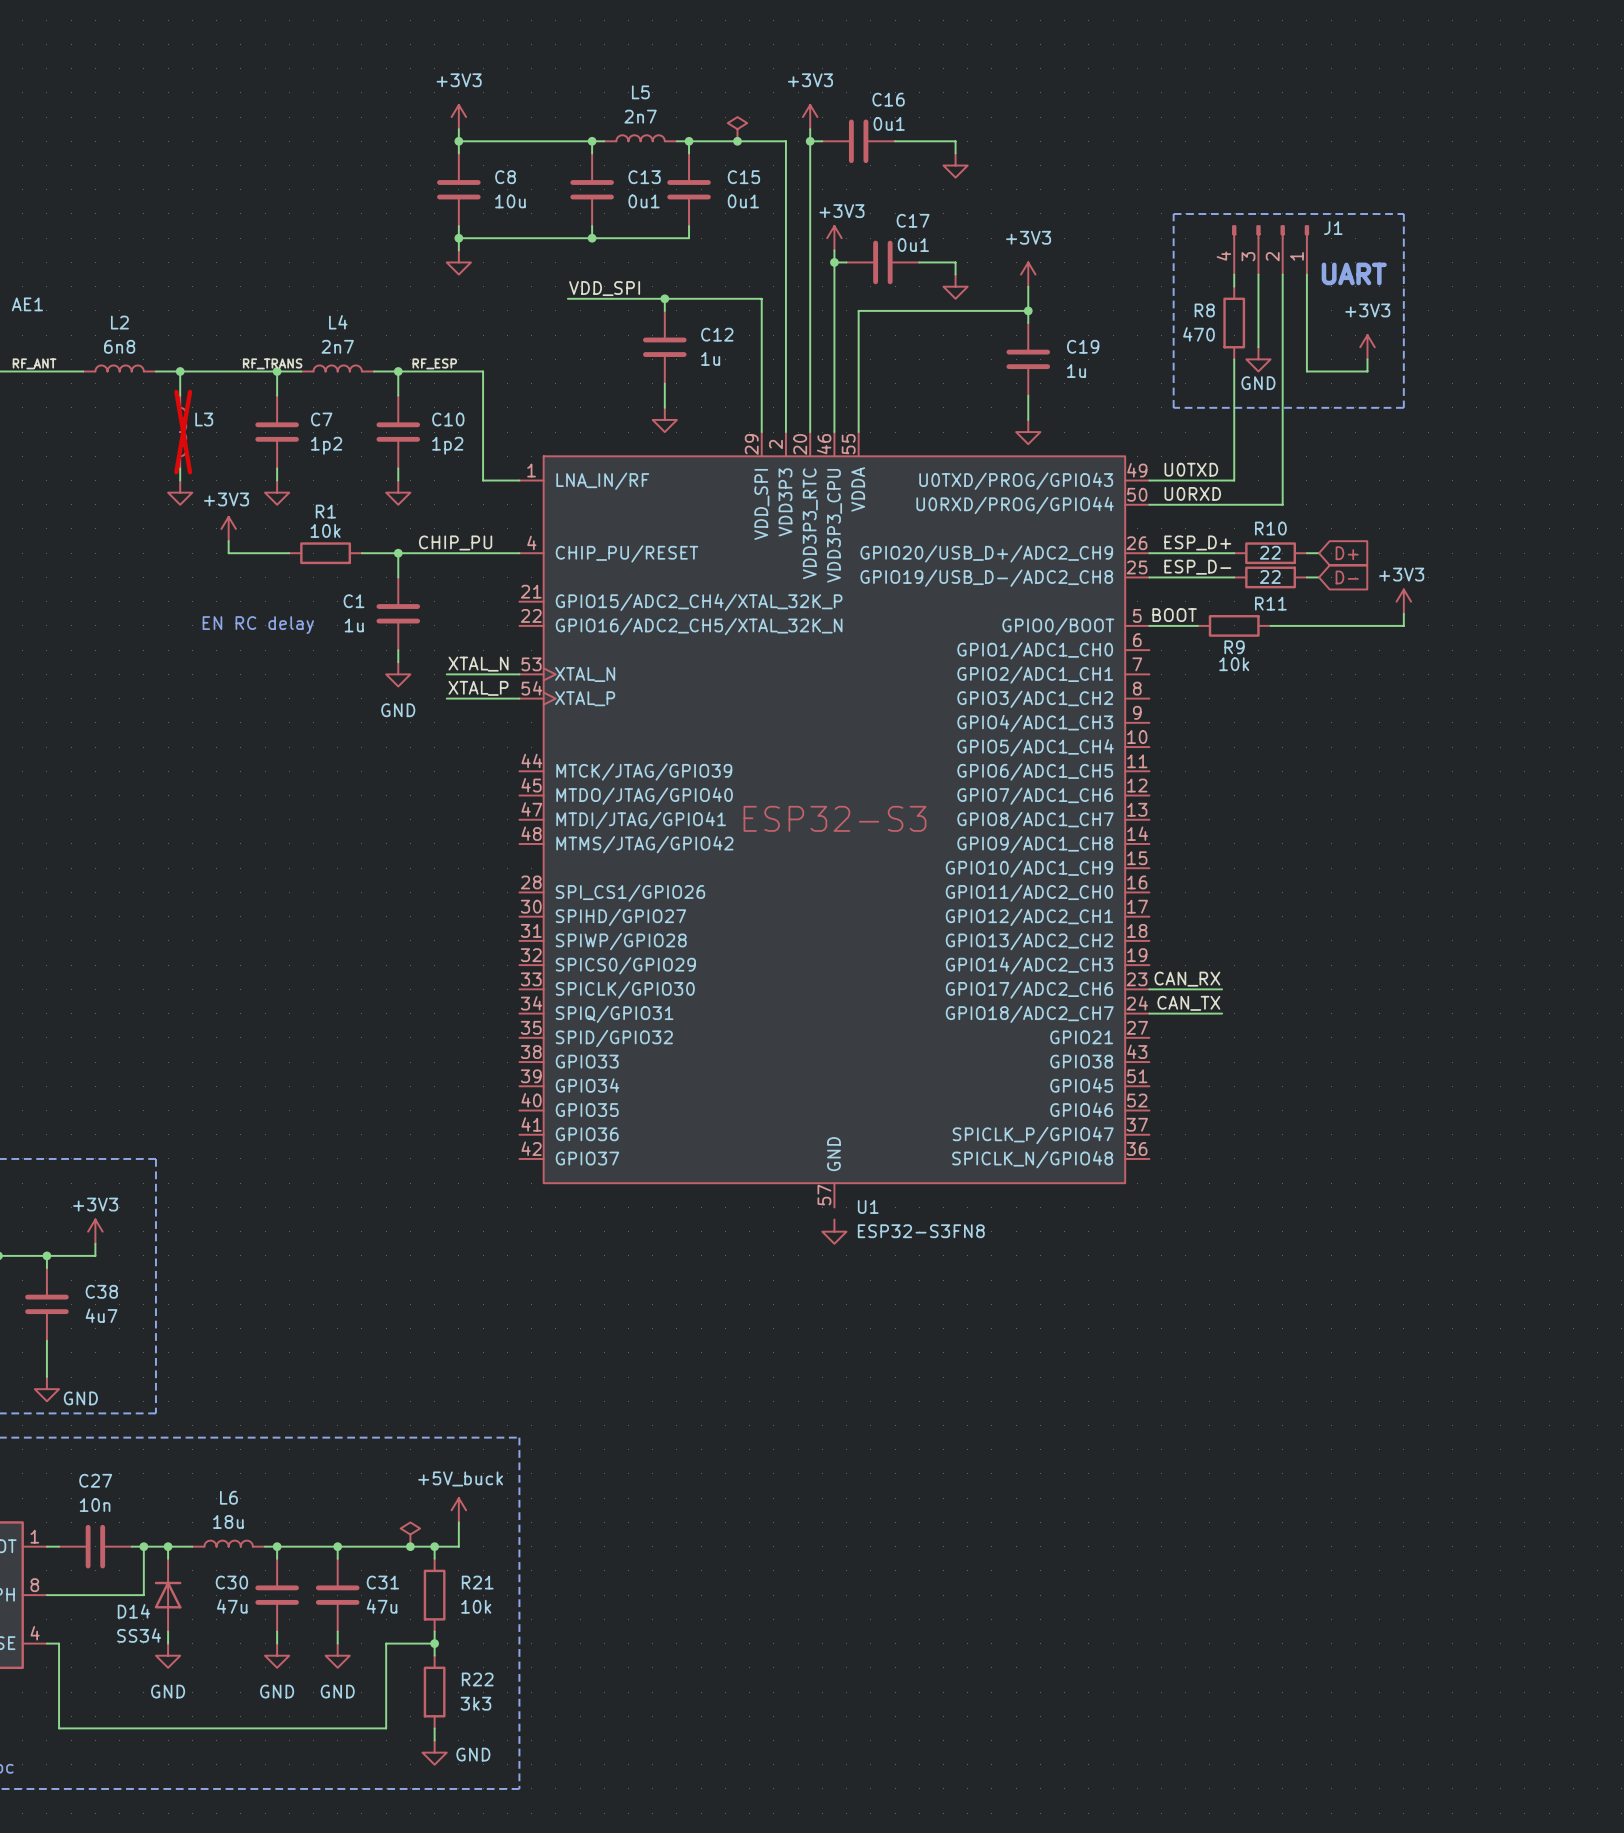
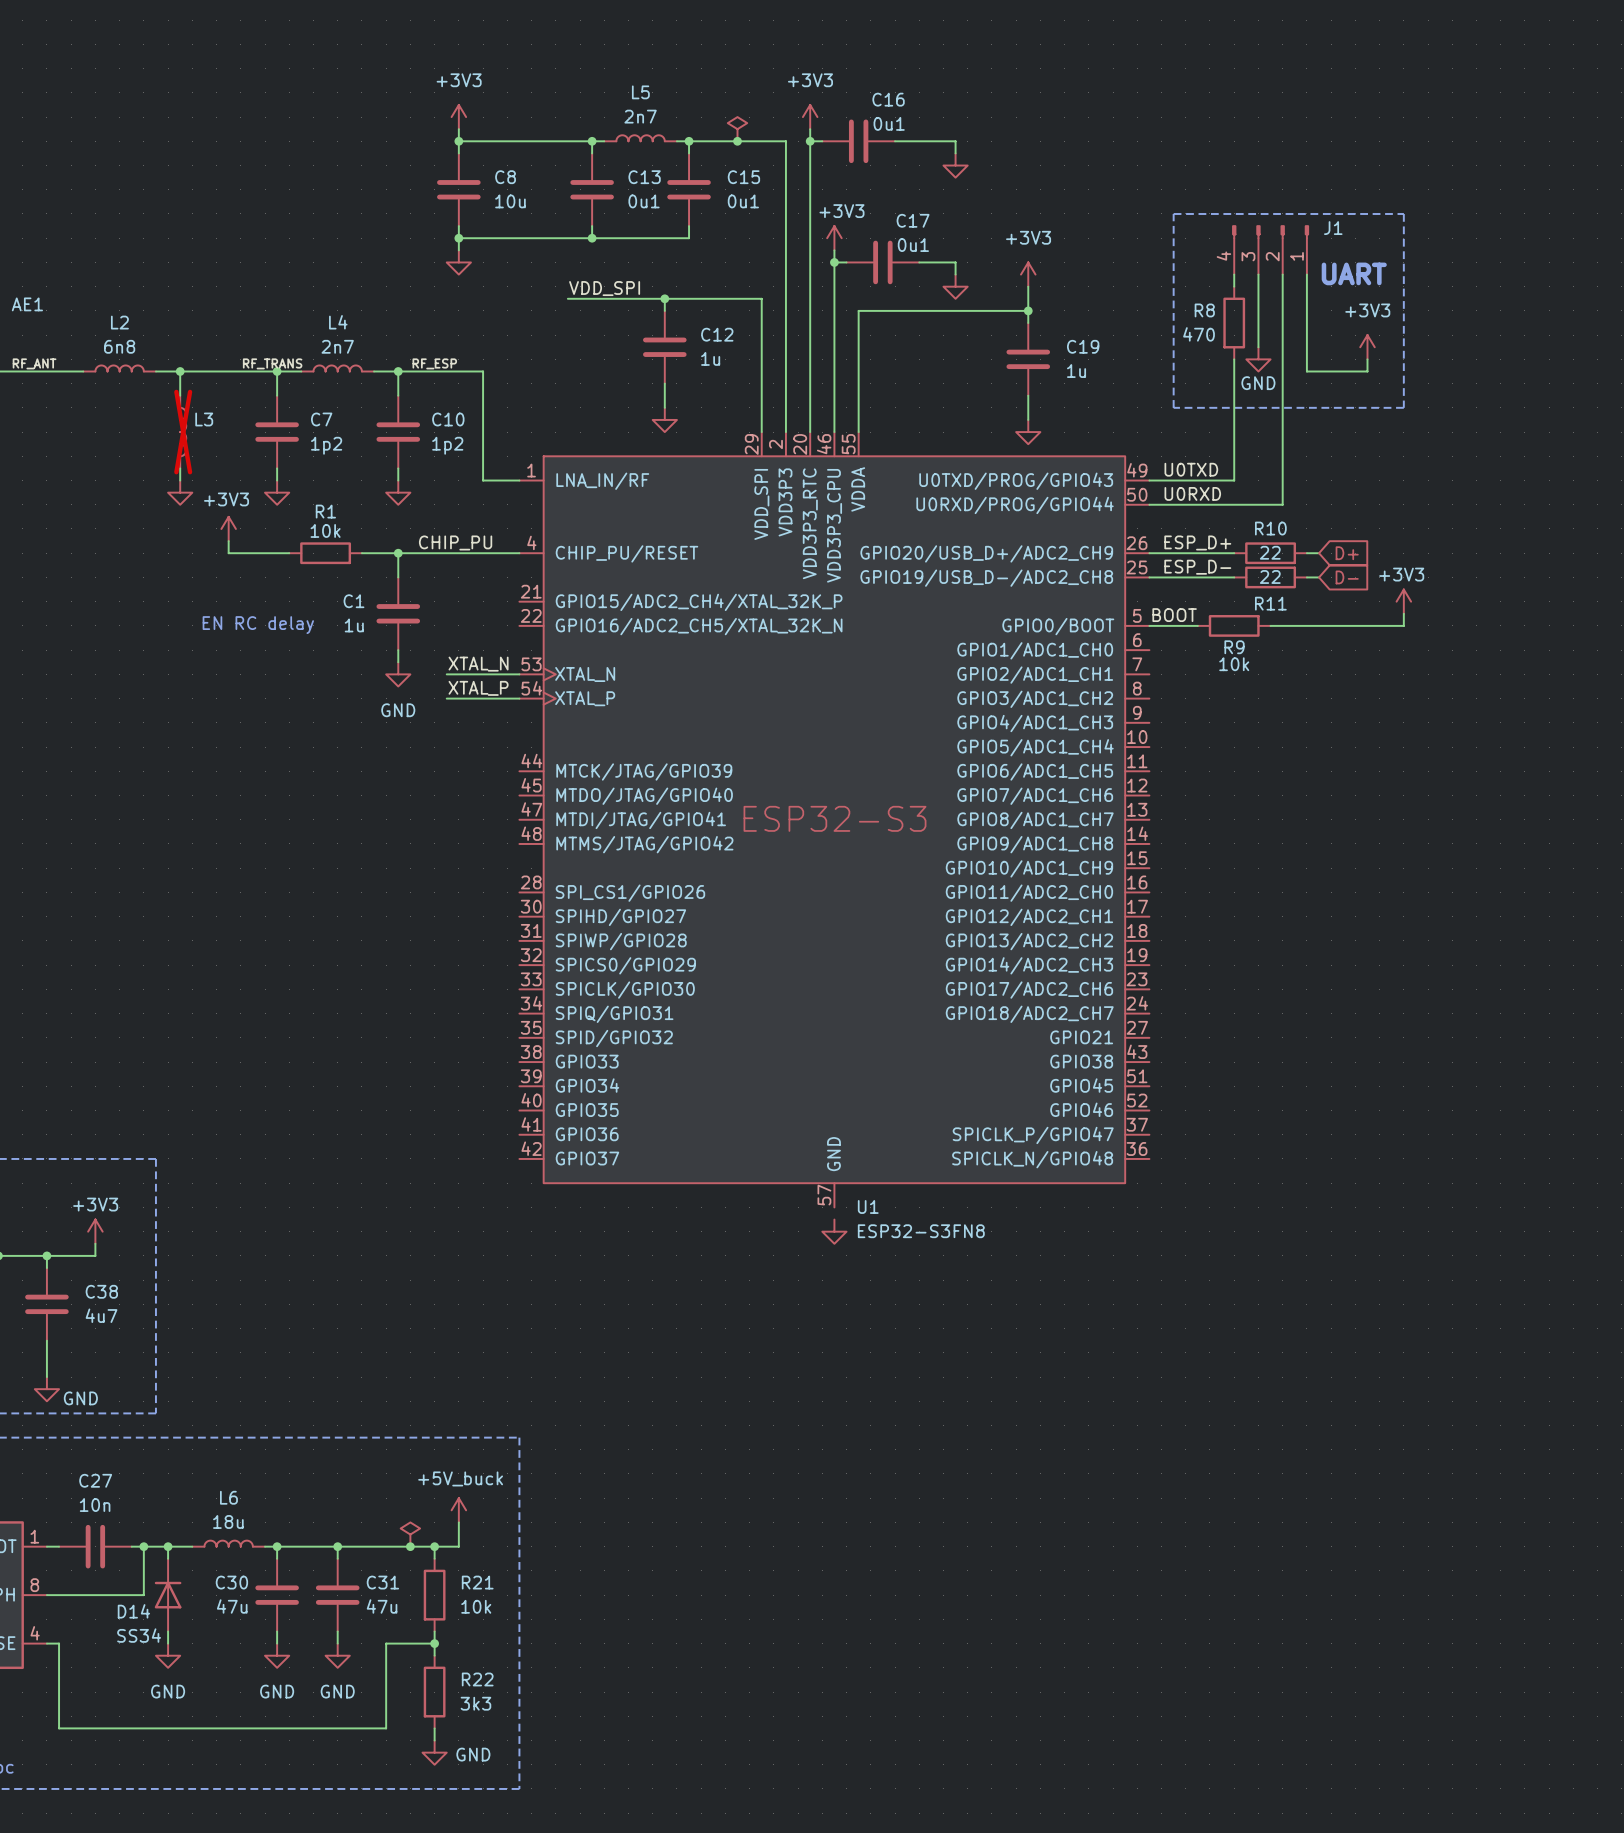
label: CAN_RX (1187, 979) -> none
wire: (1149, 989) (1222, 989) -> none
label: CAN_TX (1188, 1003) -> none
wire: (1149, 1013) (1222, 1013) -> none

